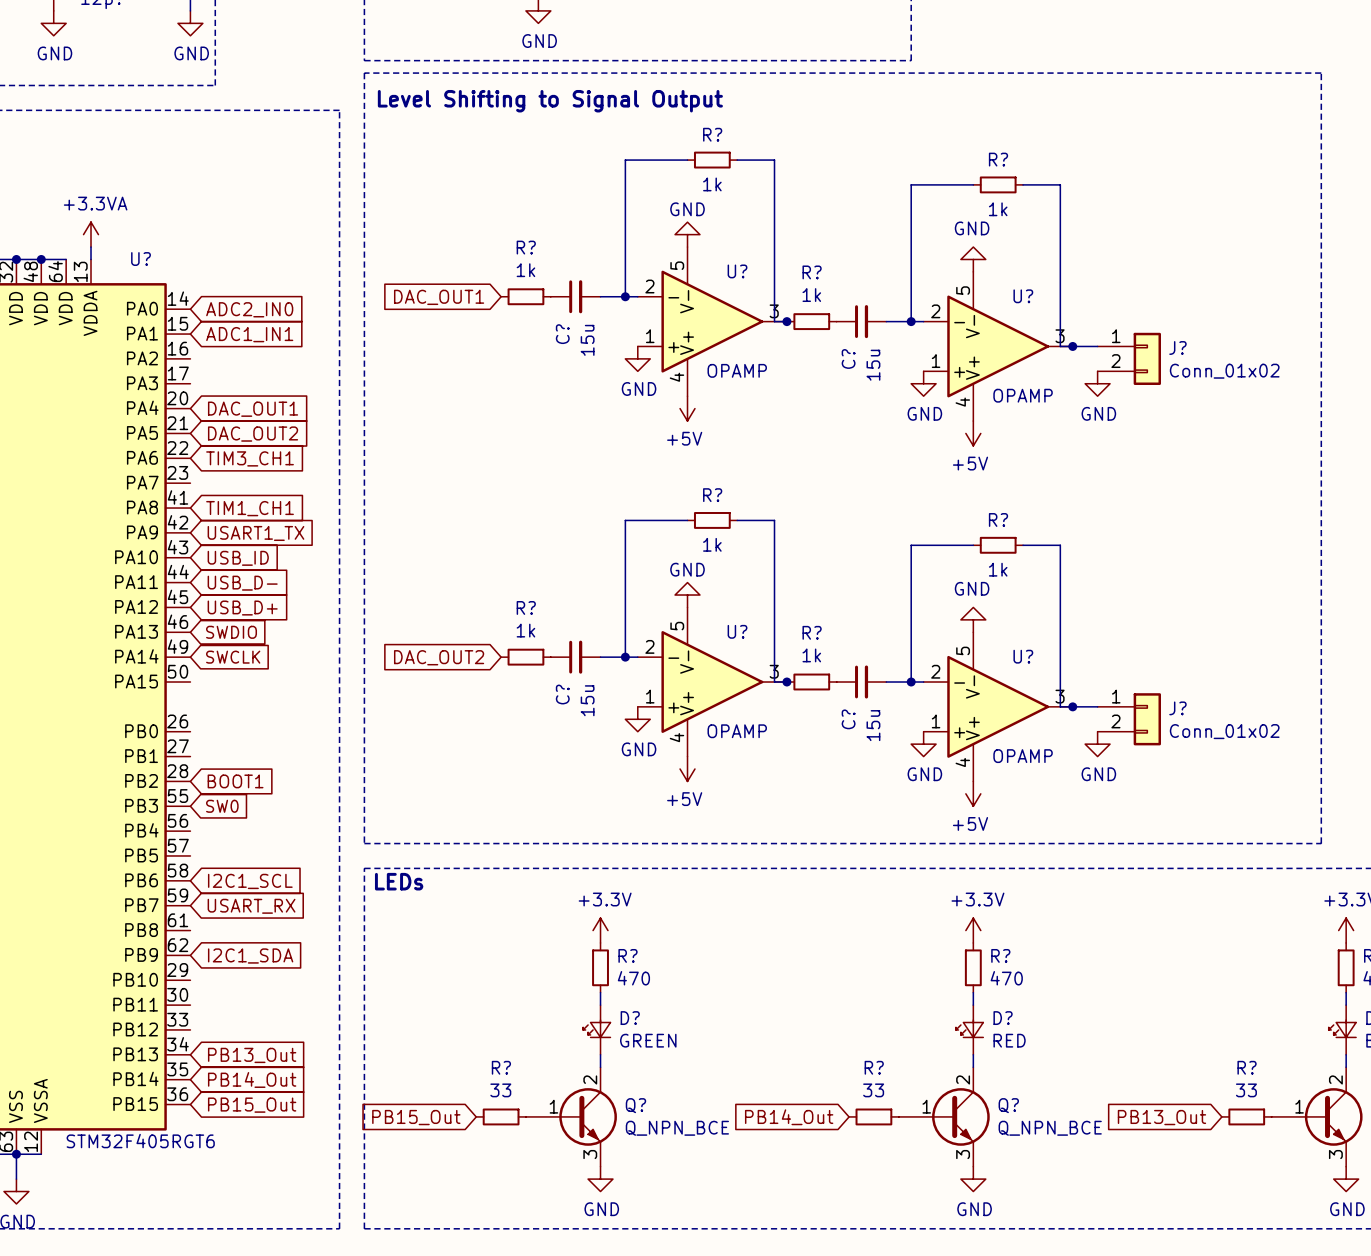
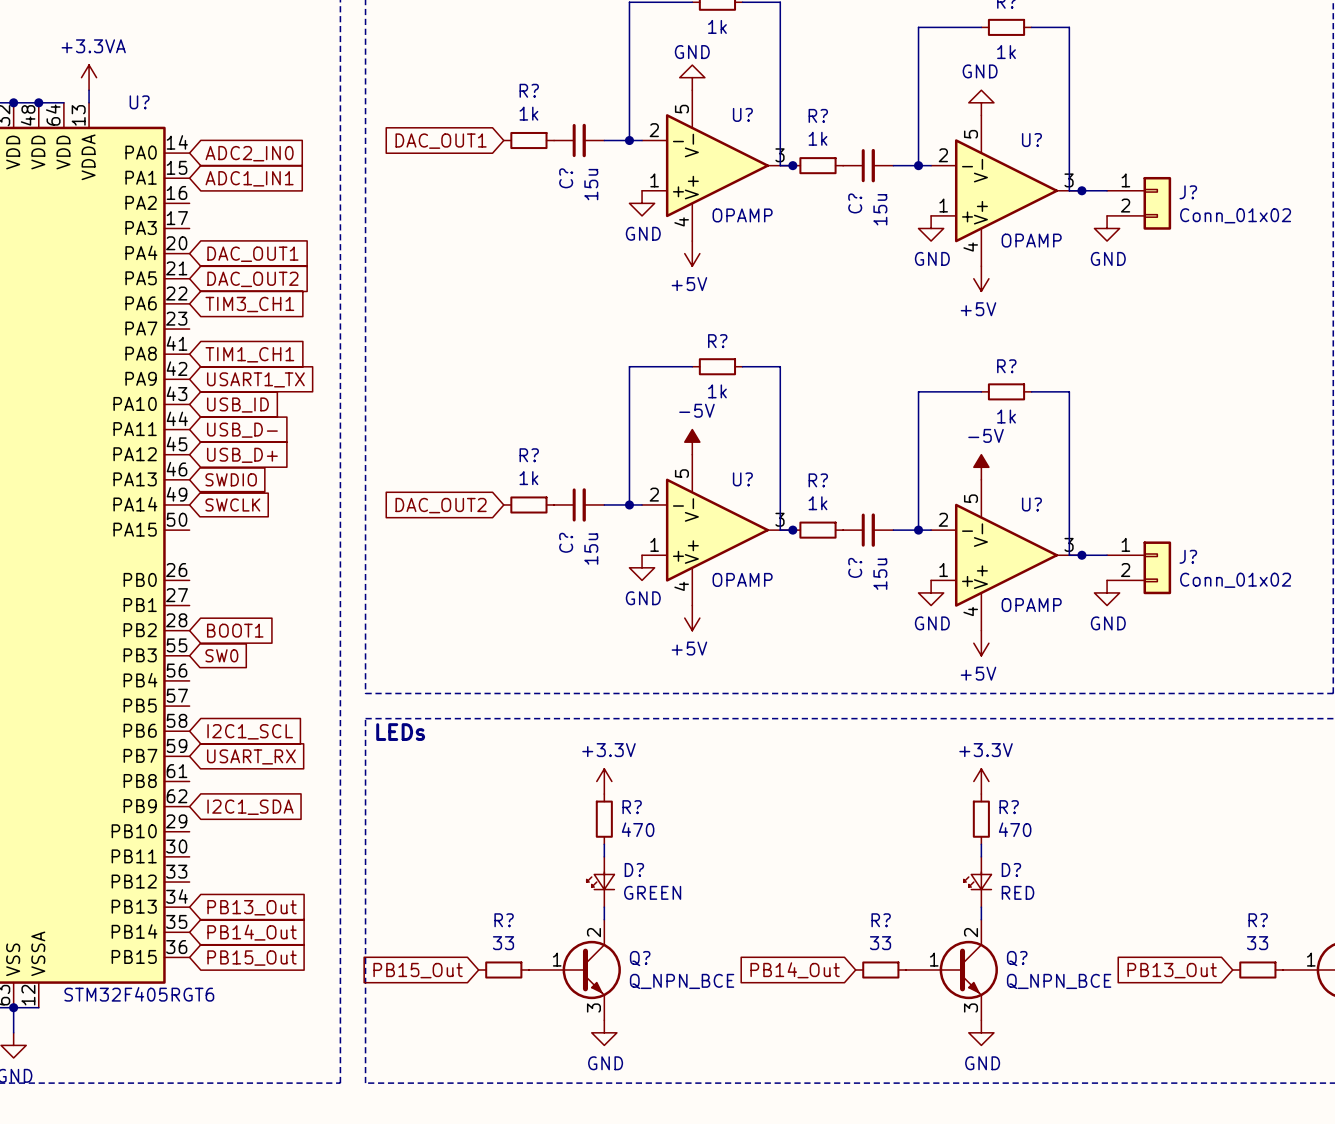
power symbol: GND (687, 595) -> -5V (692, 442)
power symbol: GND (973, 619) -> -5V (981, 467)

